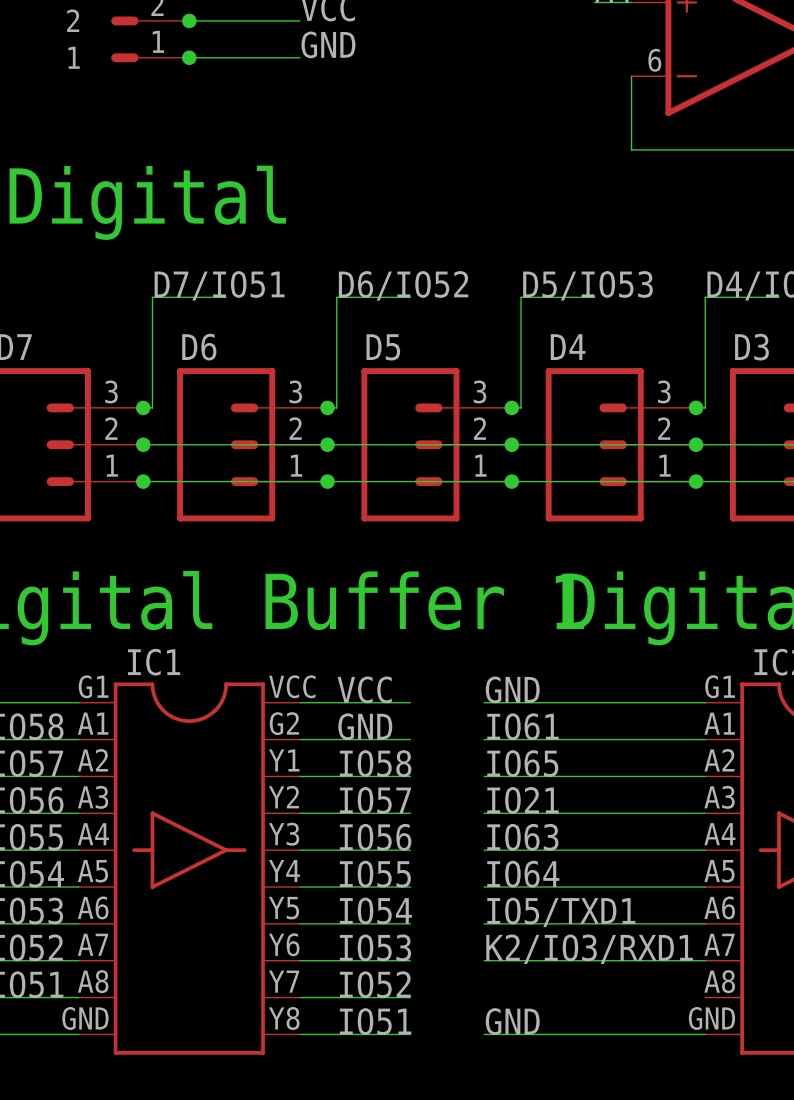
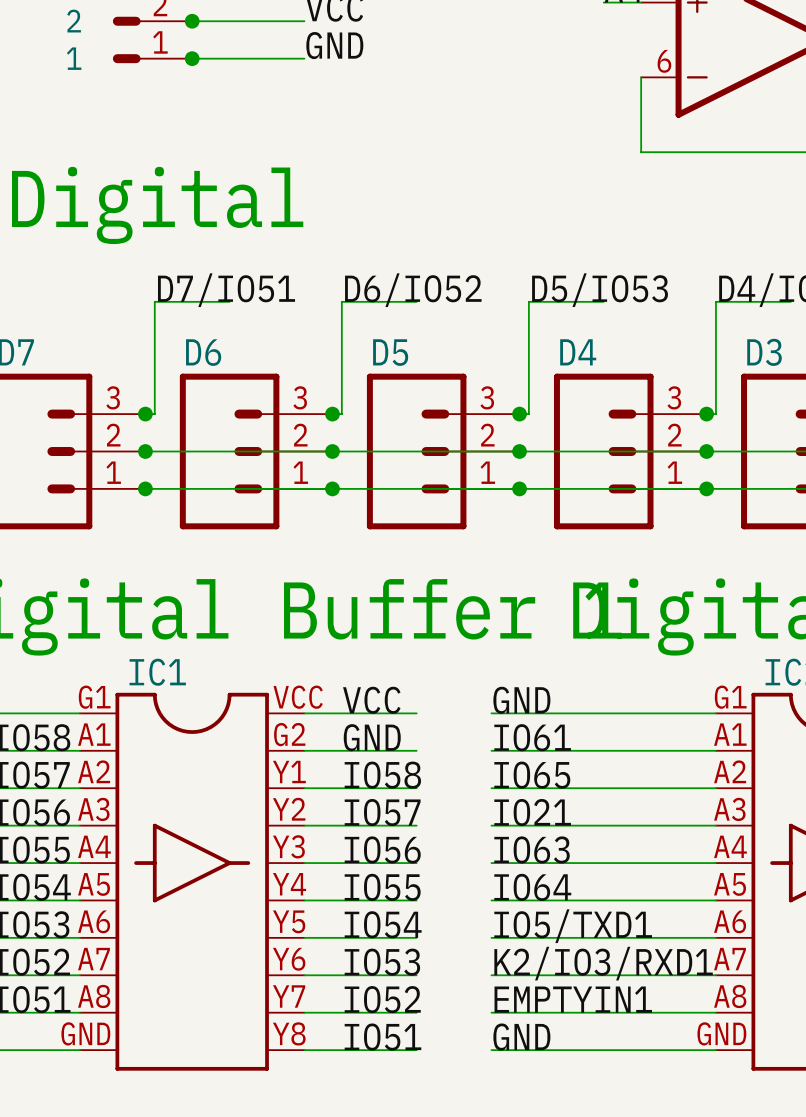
label: none -> EMPTYIN1 (573, 999)
wire: none -> (491, 1012) (715, 1012)

